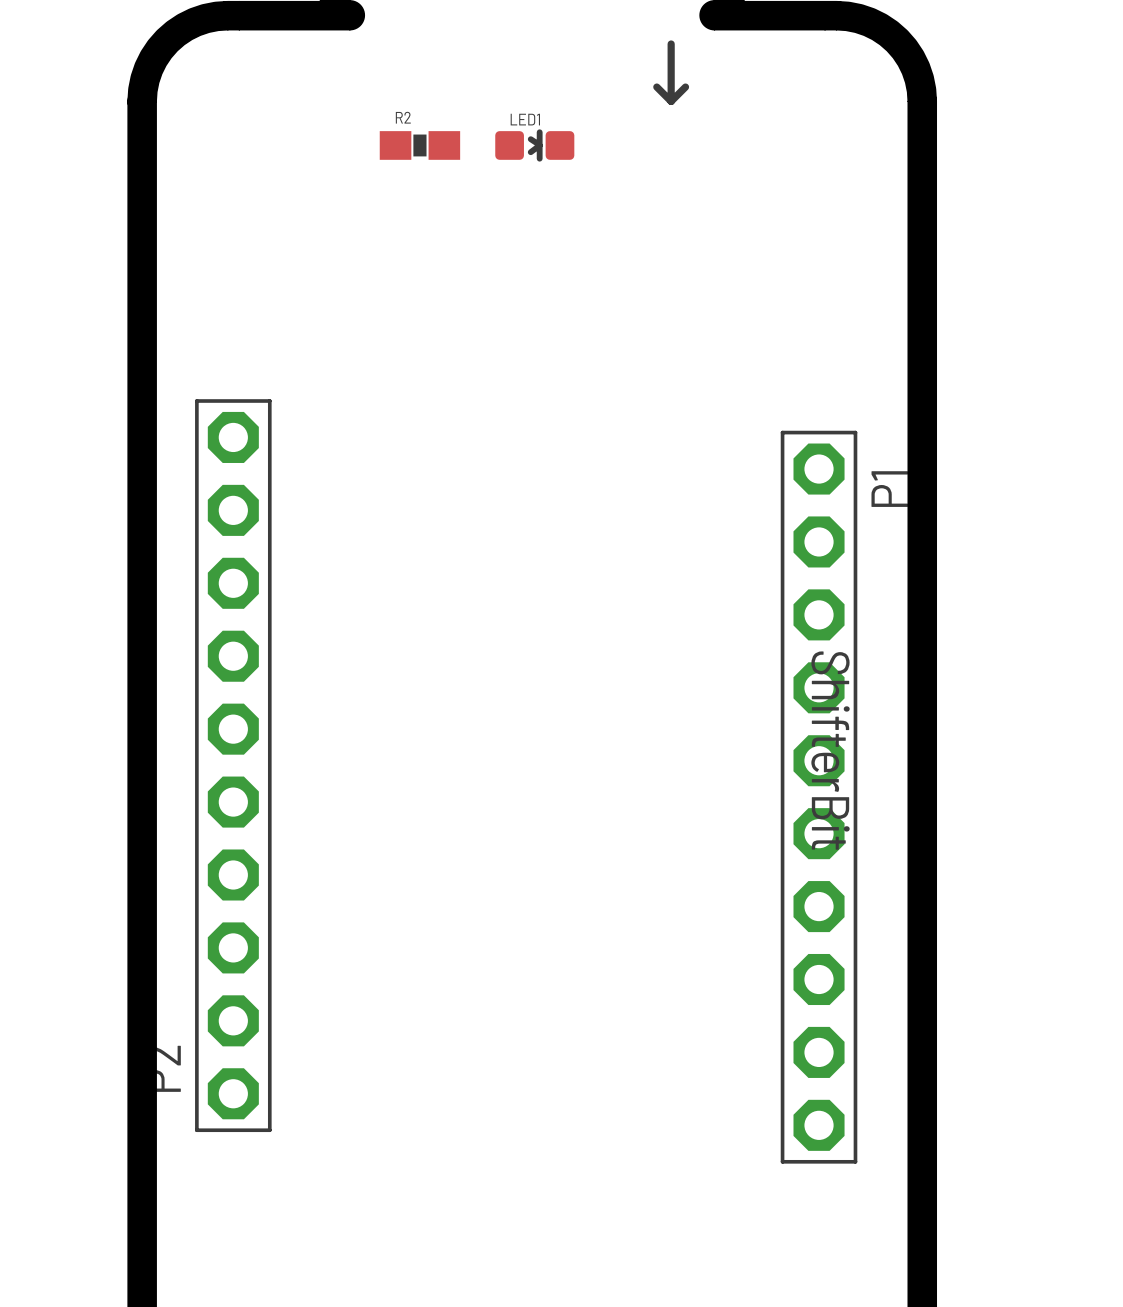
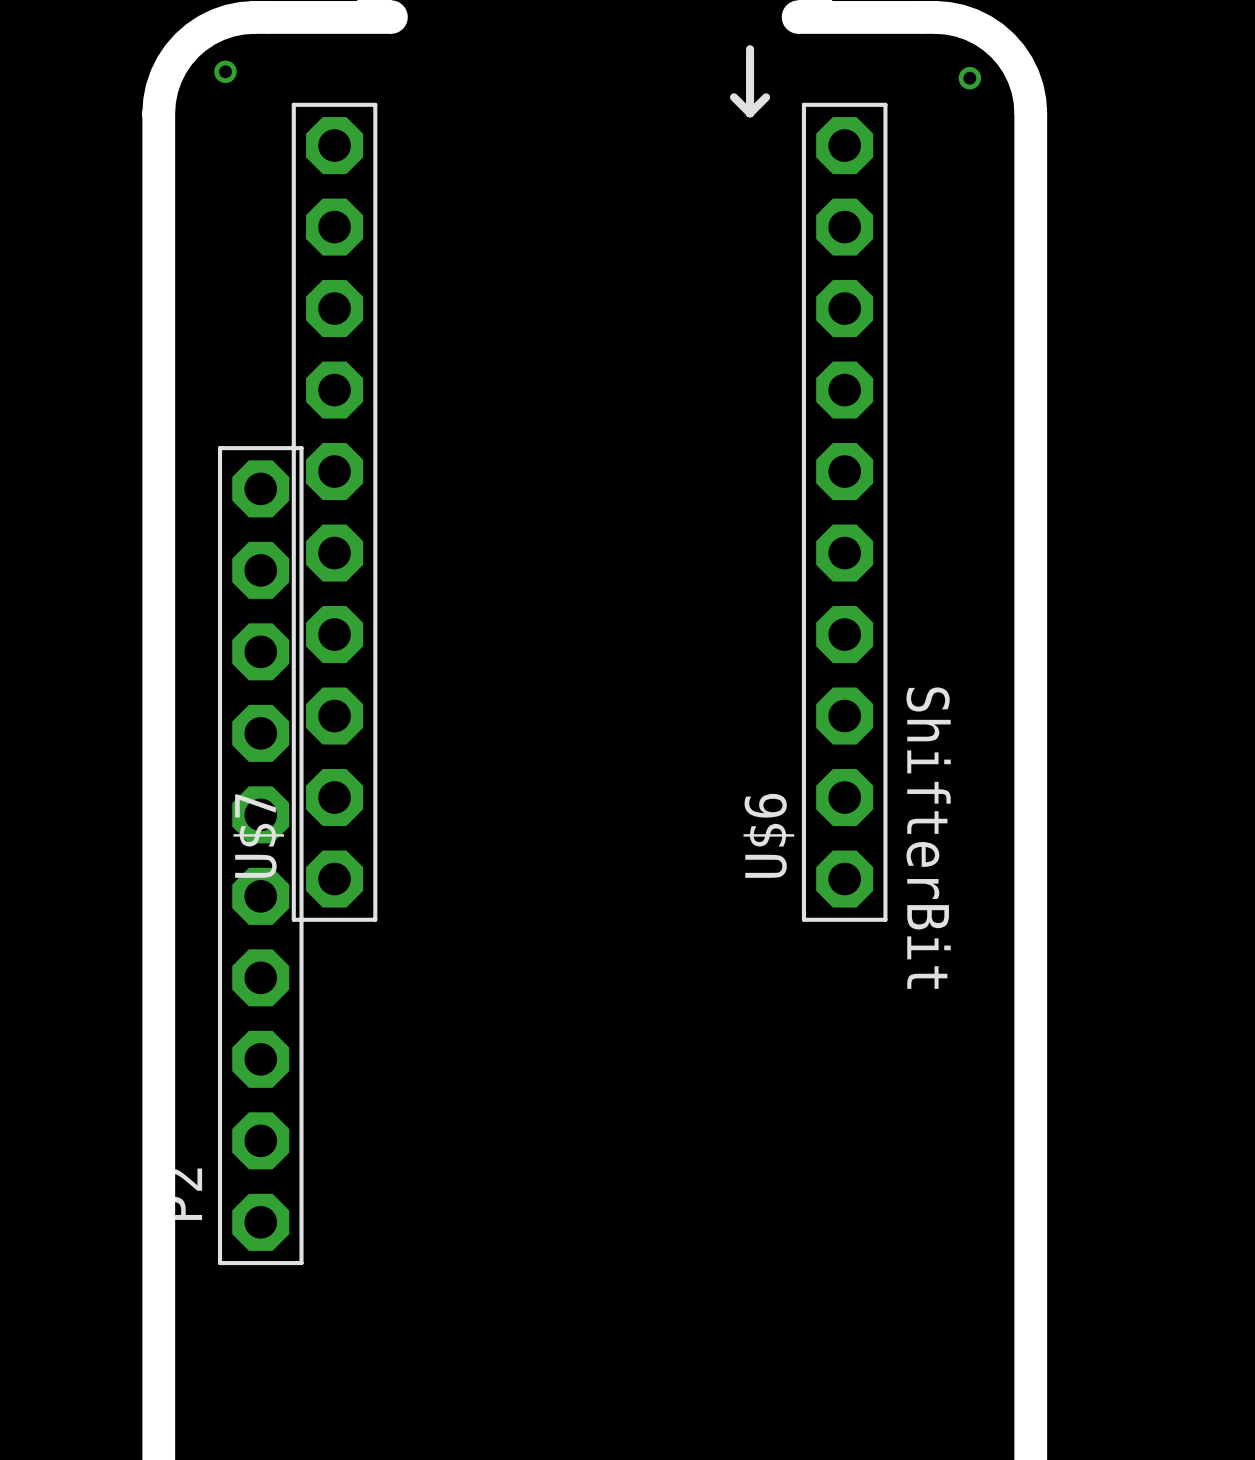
via: none -> (225, 71)
via: none -> (969, 78)
R2: (419, 145) -> none
LED1: (534, 145) -> none
U$7: none -> (334, 512)
U$6: none -> (844, 512)
P1: (819, 797) -> none

